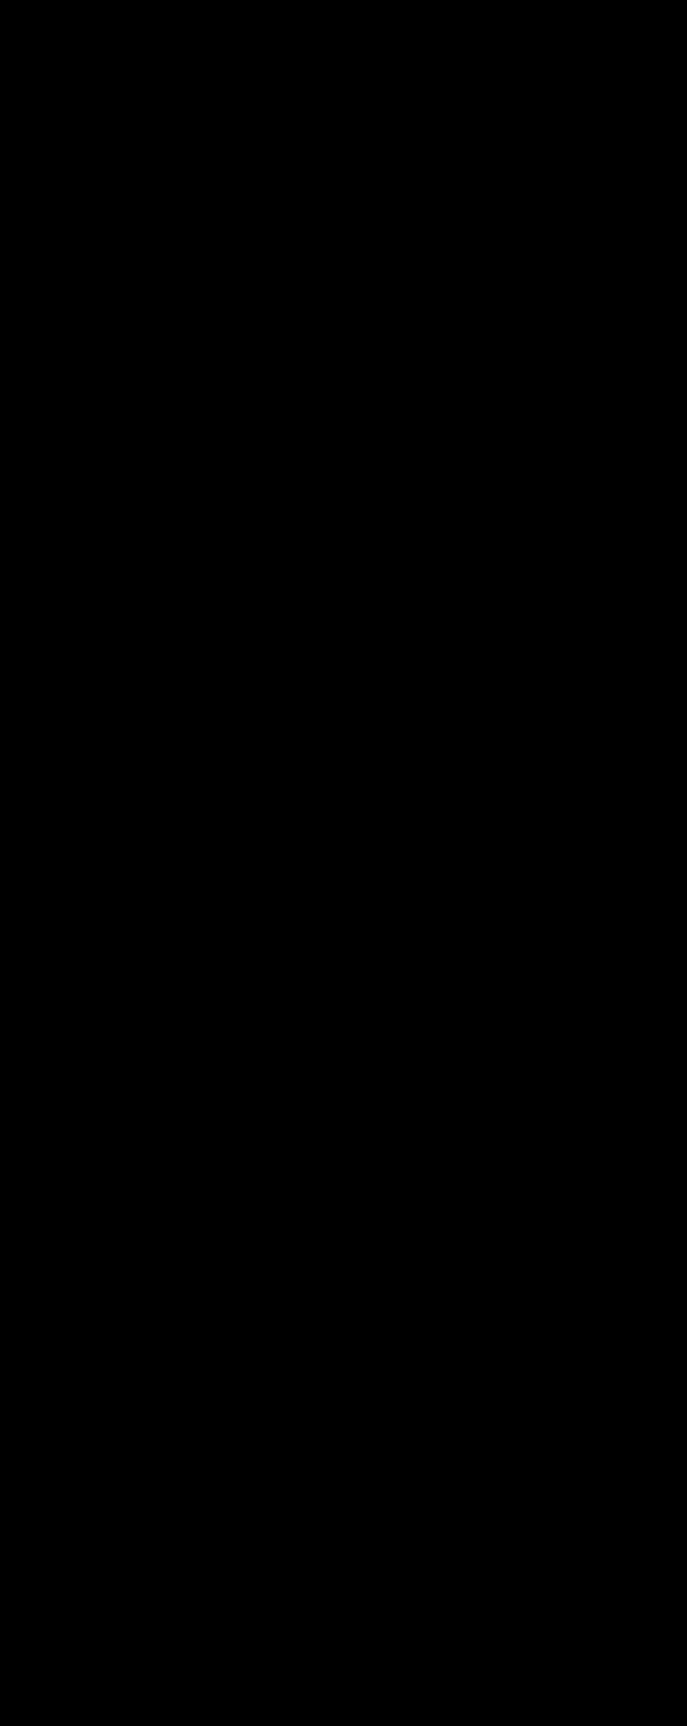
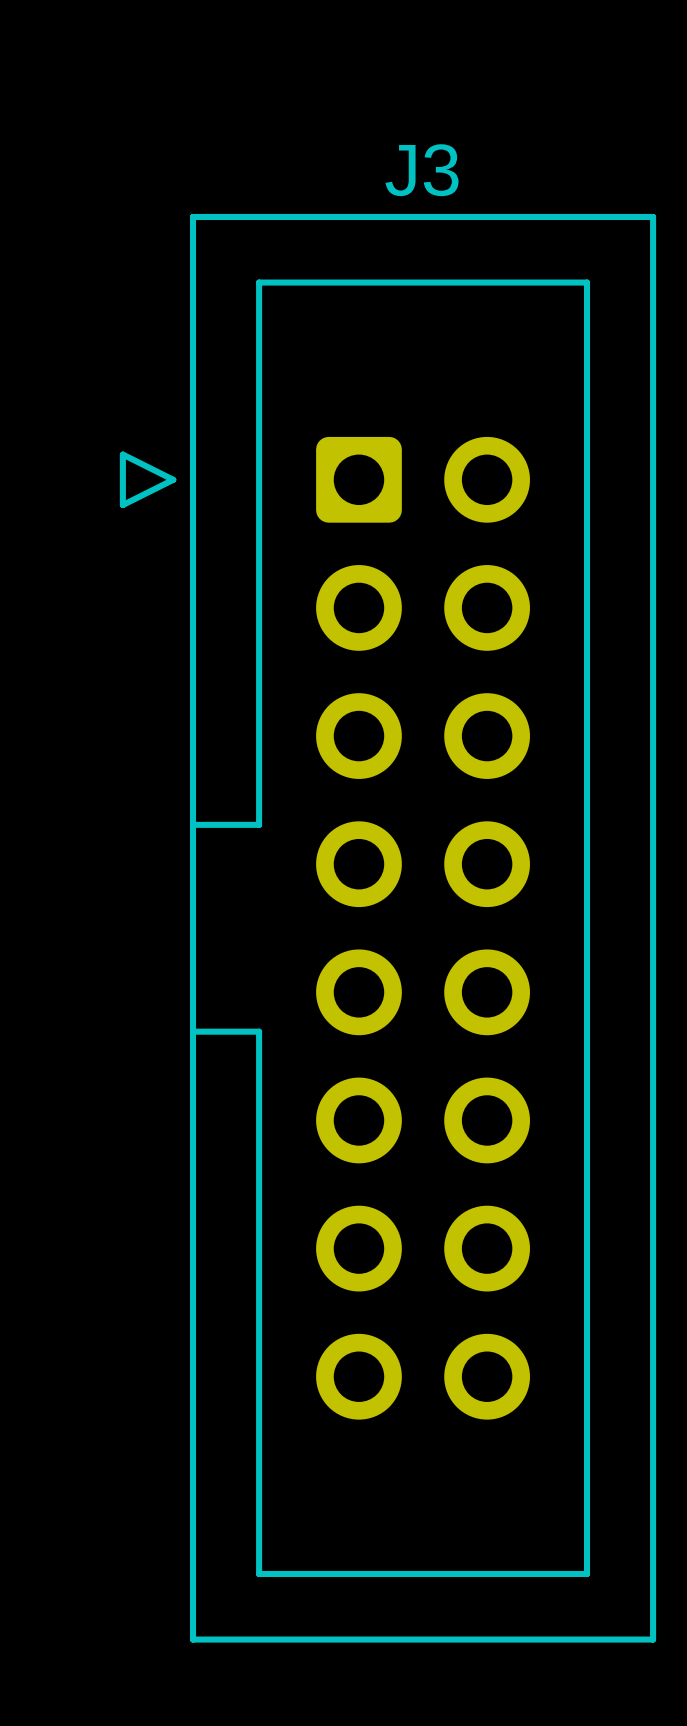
J3: none -> (387, 928)

